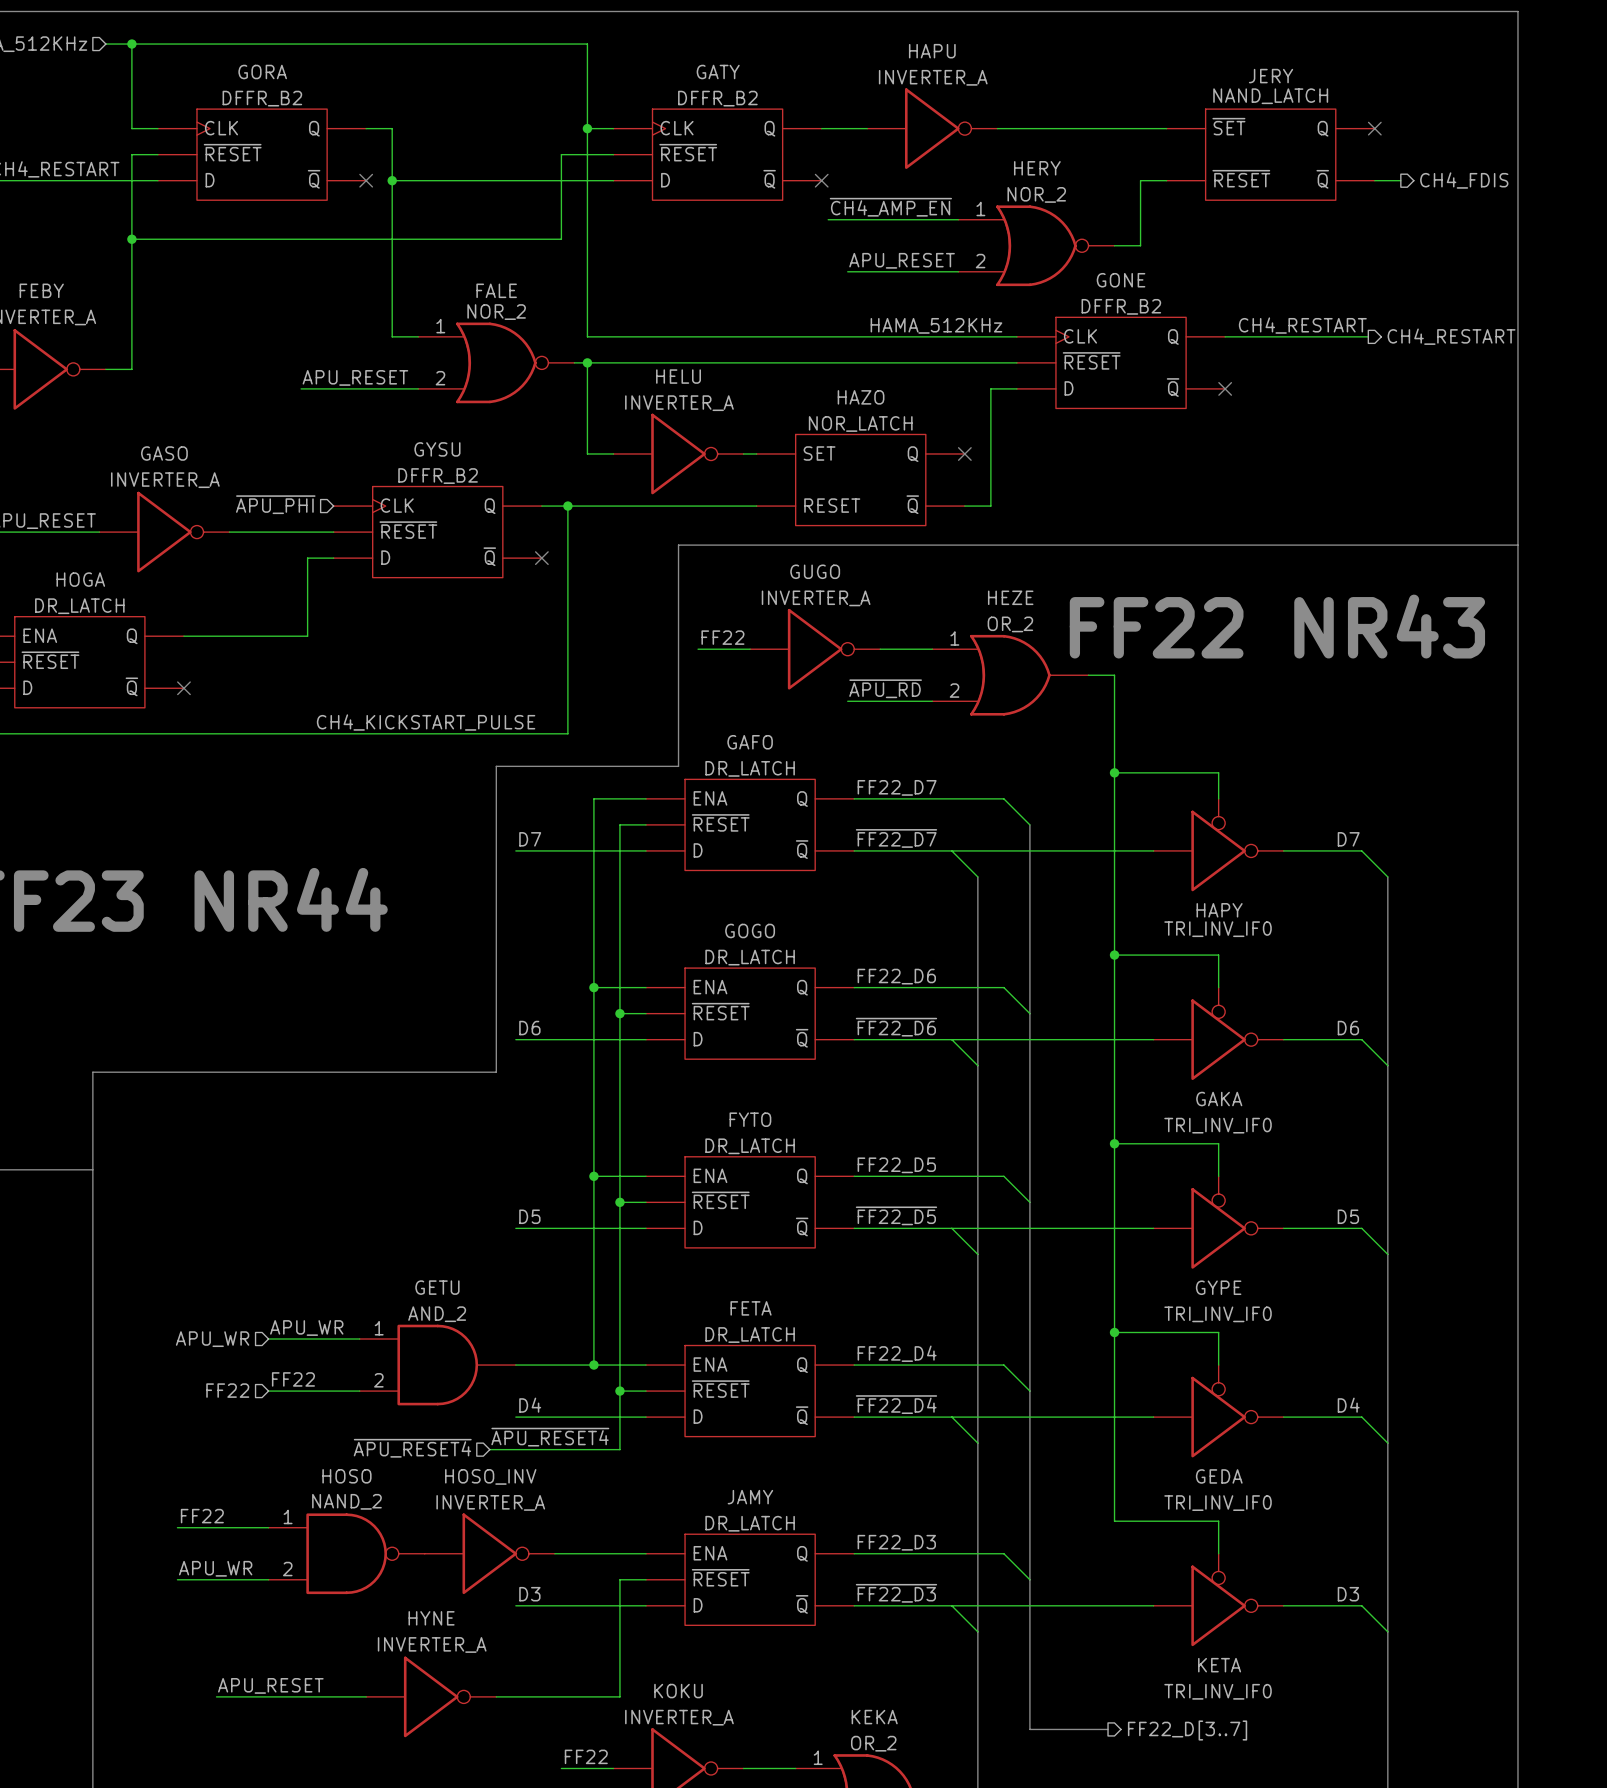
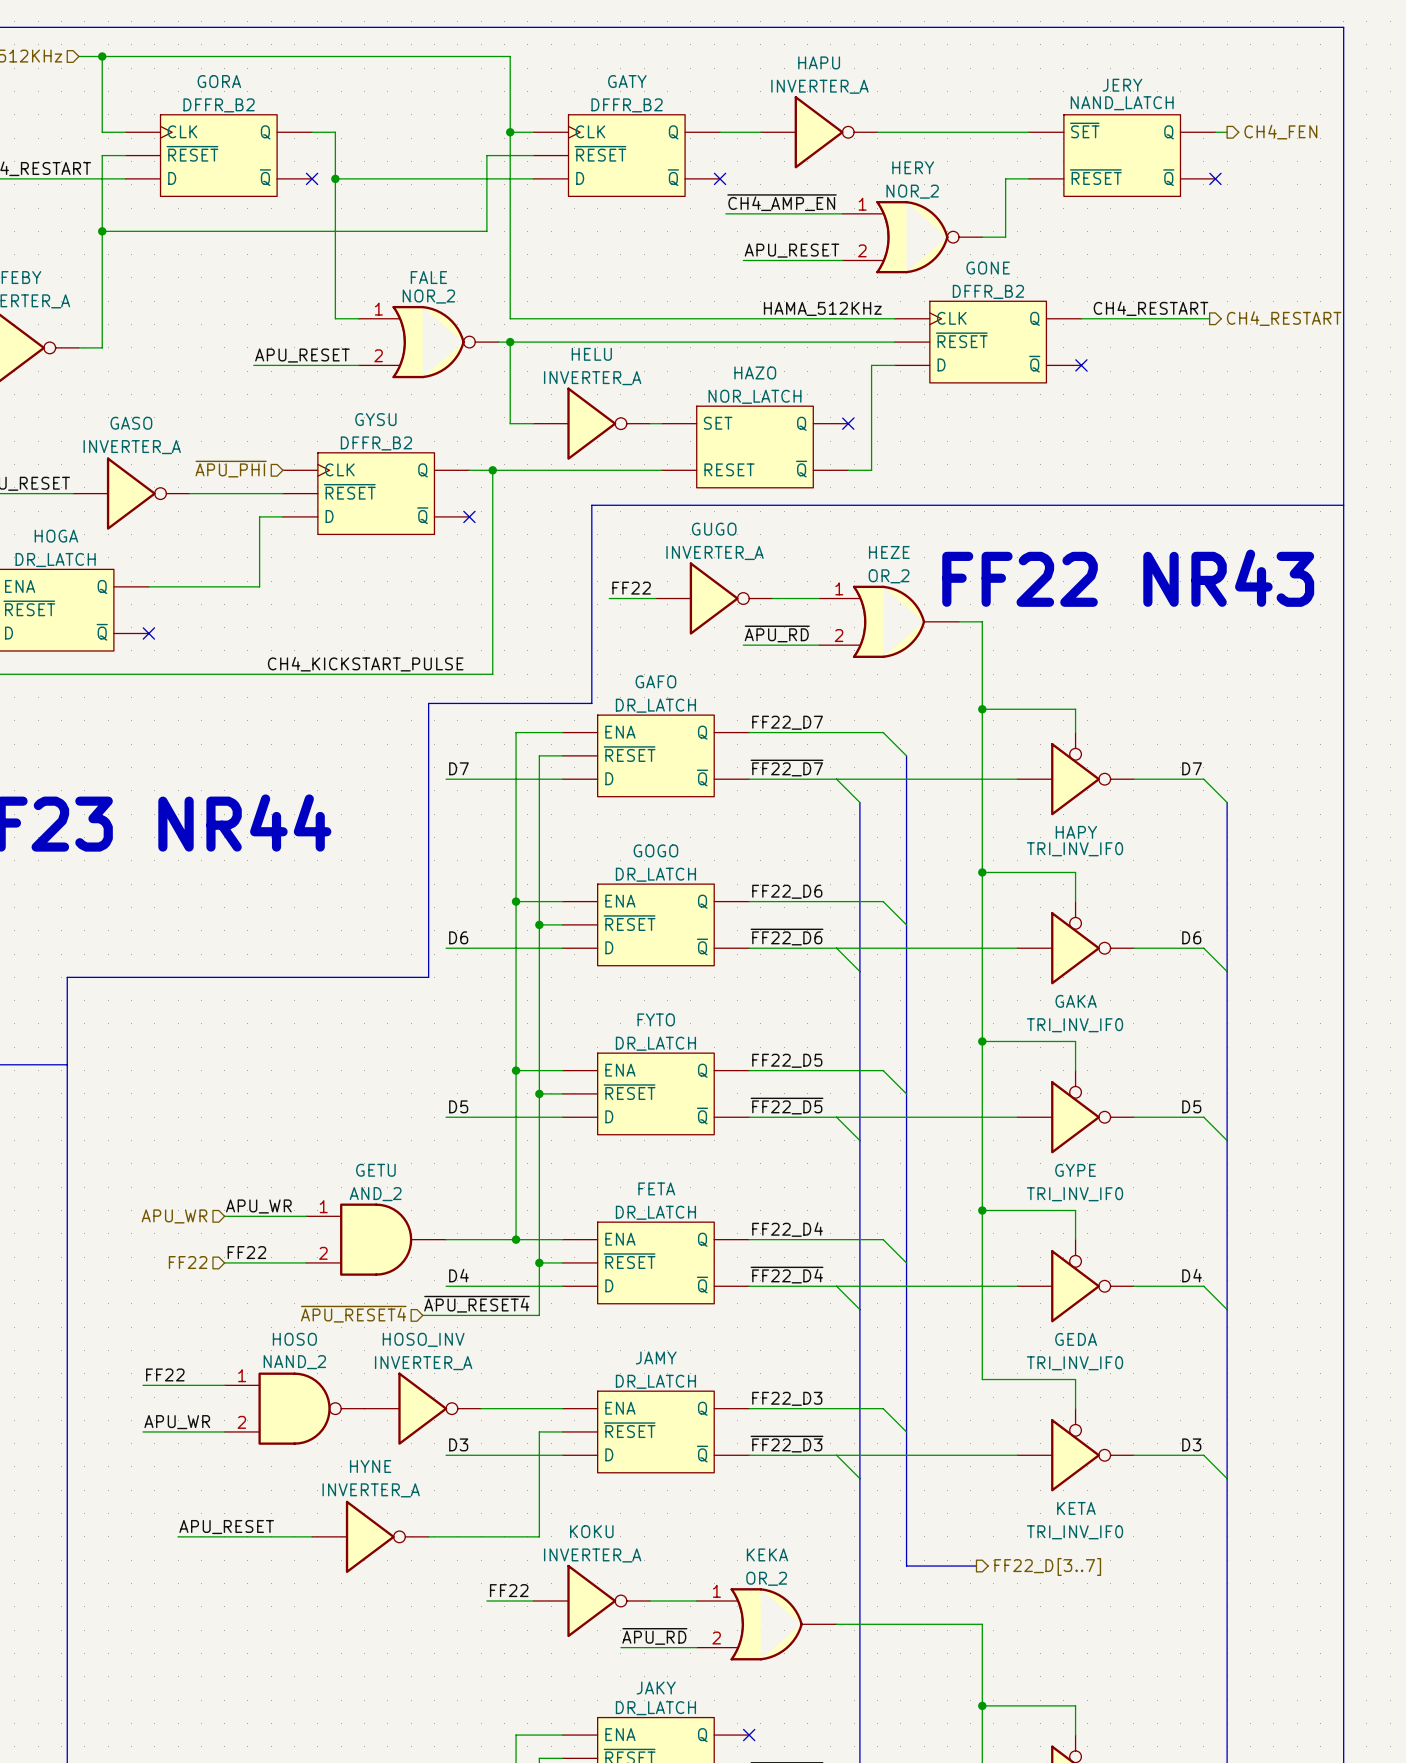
wire: none -> (1215, 132) (1227, 132)
no-connect mark position: (1374, 128) -> (1215, 178)
hierarchical label: none -> CH4_FEN (1280, 132)
wire: (1374, 180) (1400, 180) -> none
hierarchical label: CH4_FDIS (1464, 180) -> none

